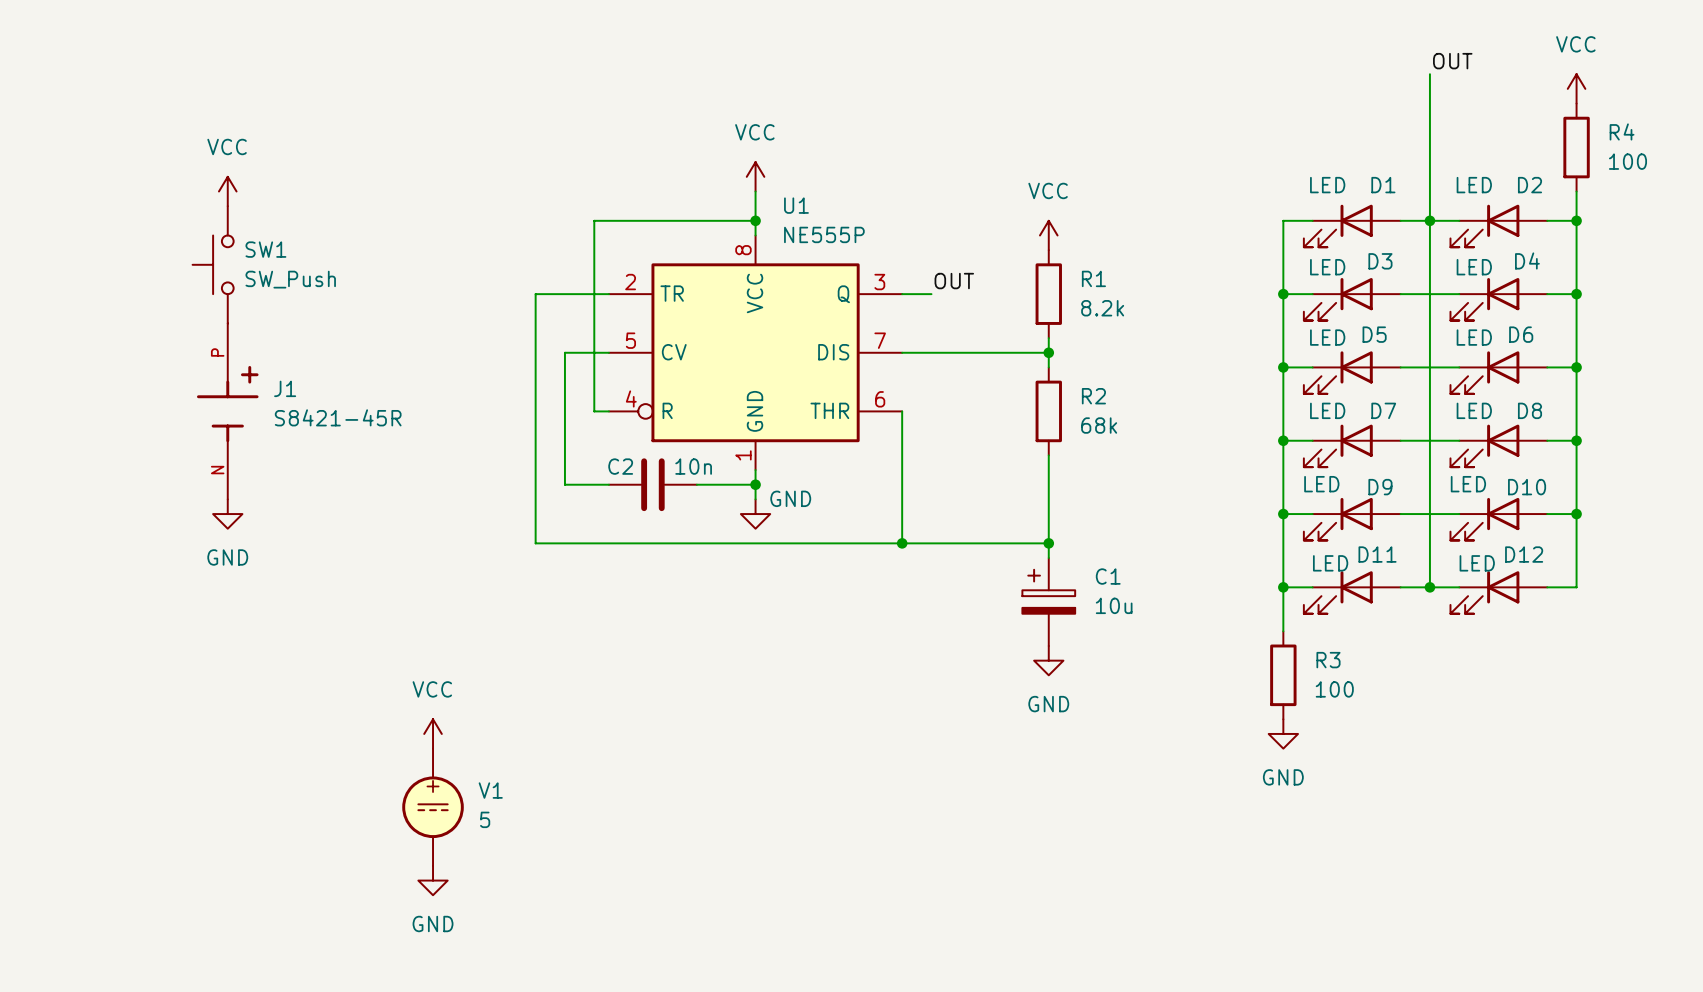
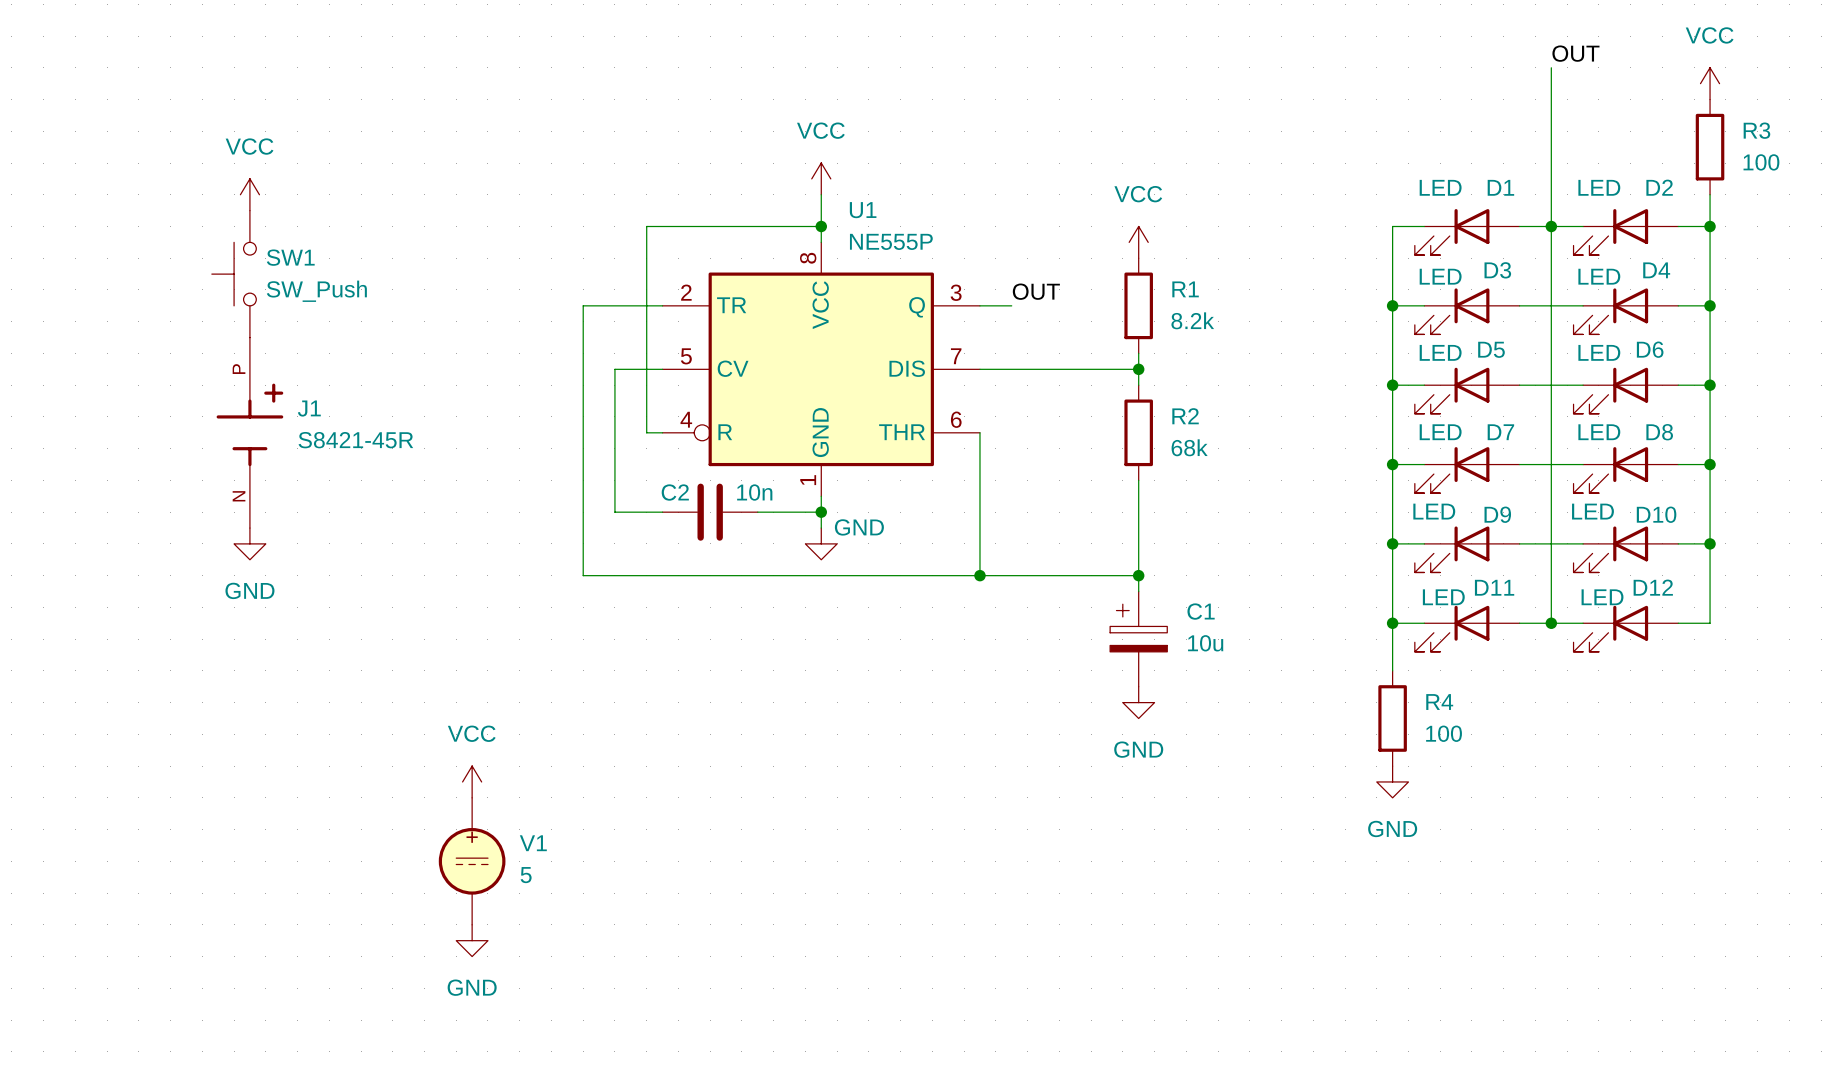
R4 name: R4 (1622, 131) -> R3 (1756, 130)
R3 name: R3 (1328, 660) -> R4 (1439, 702)

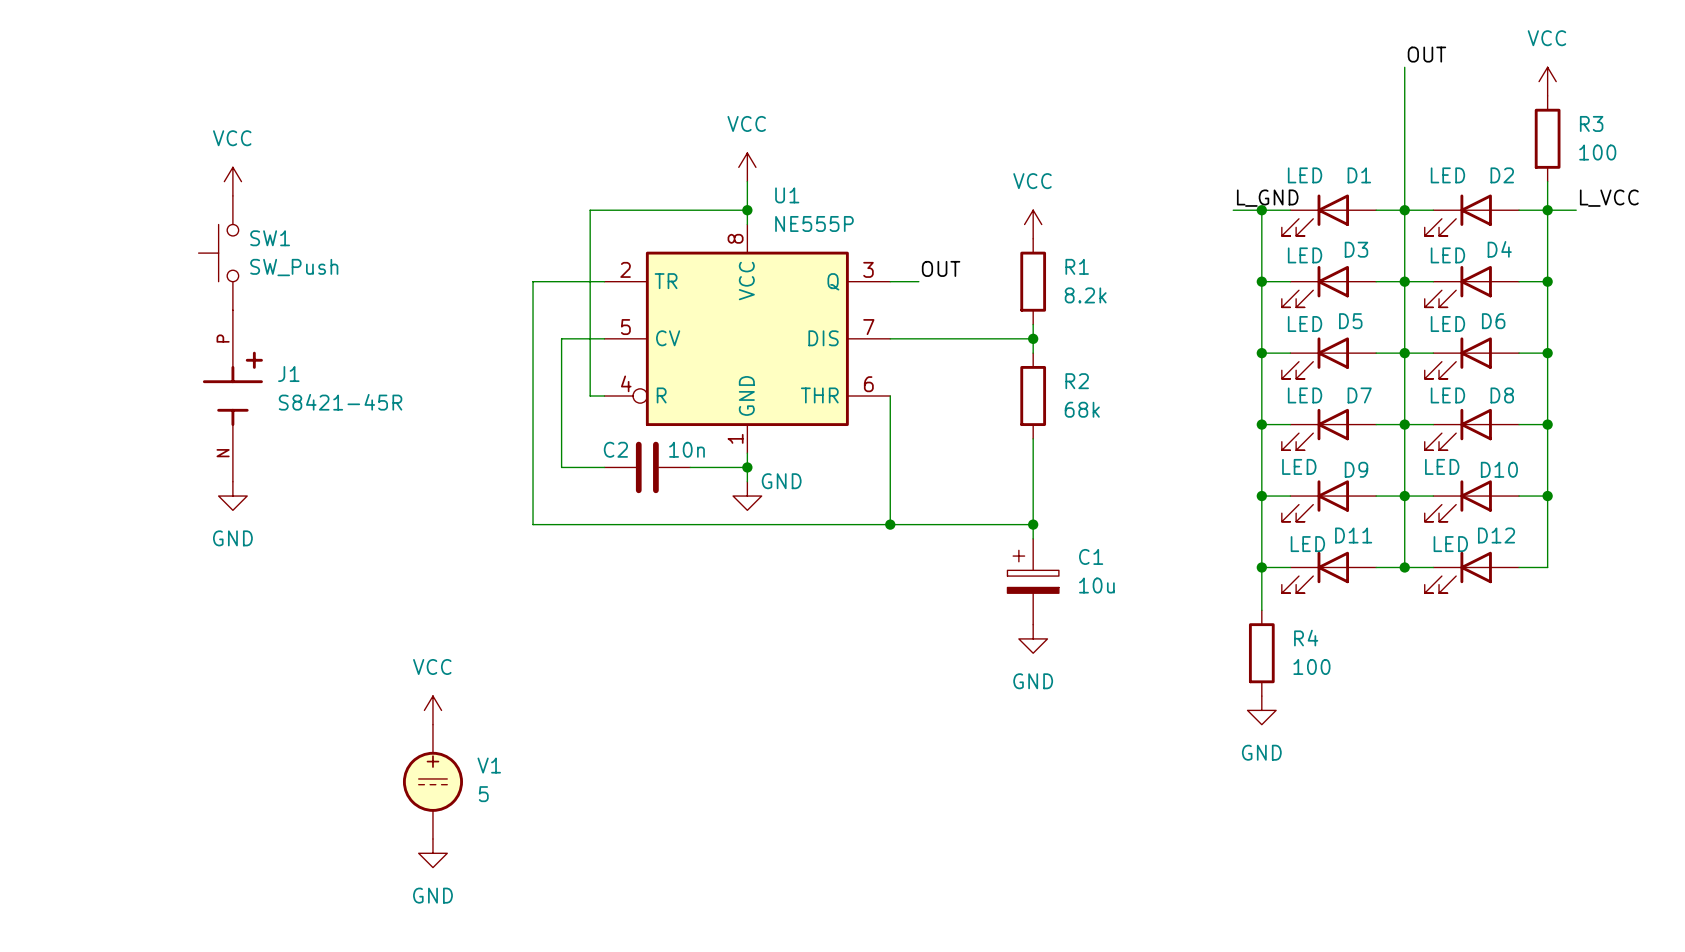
label: none -> L_GND (1267, 198)
label: none -> L_VCC (1609, 198)
wire: none -> (1233, 210) (1261, 210)
junction: none -> (1261, 210)
wire: none -> (1547, 210) (1576, 210)
junction: none -> (1404, 281)
junction: none -> (1404, 353)
junction: none -> (1404, 424)
junction: none -> (1404, 496)

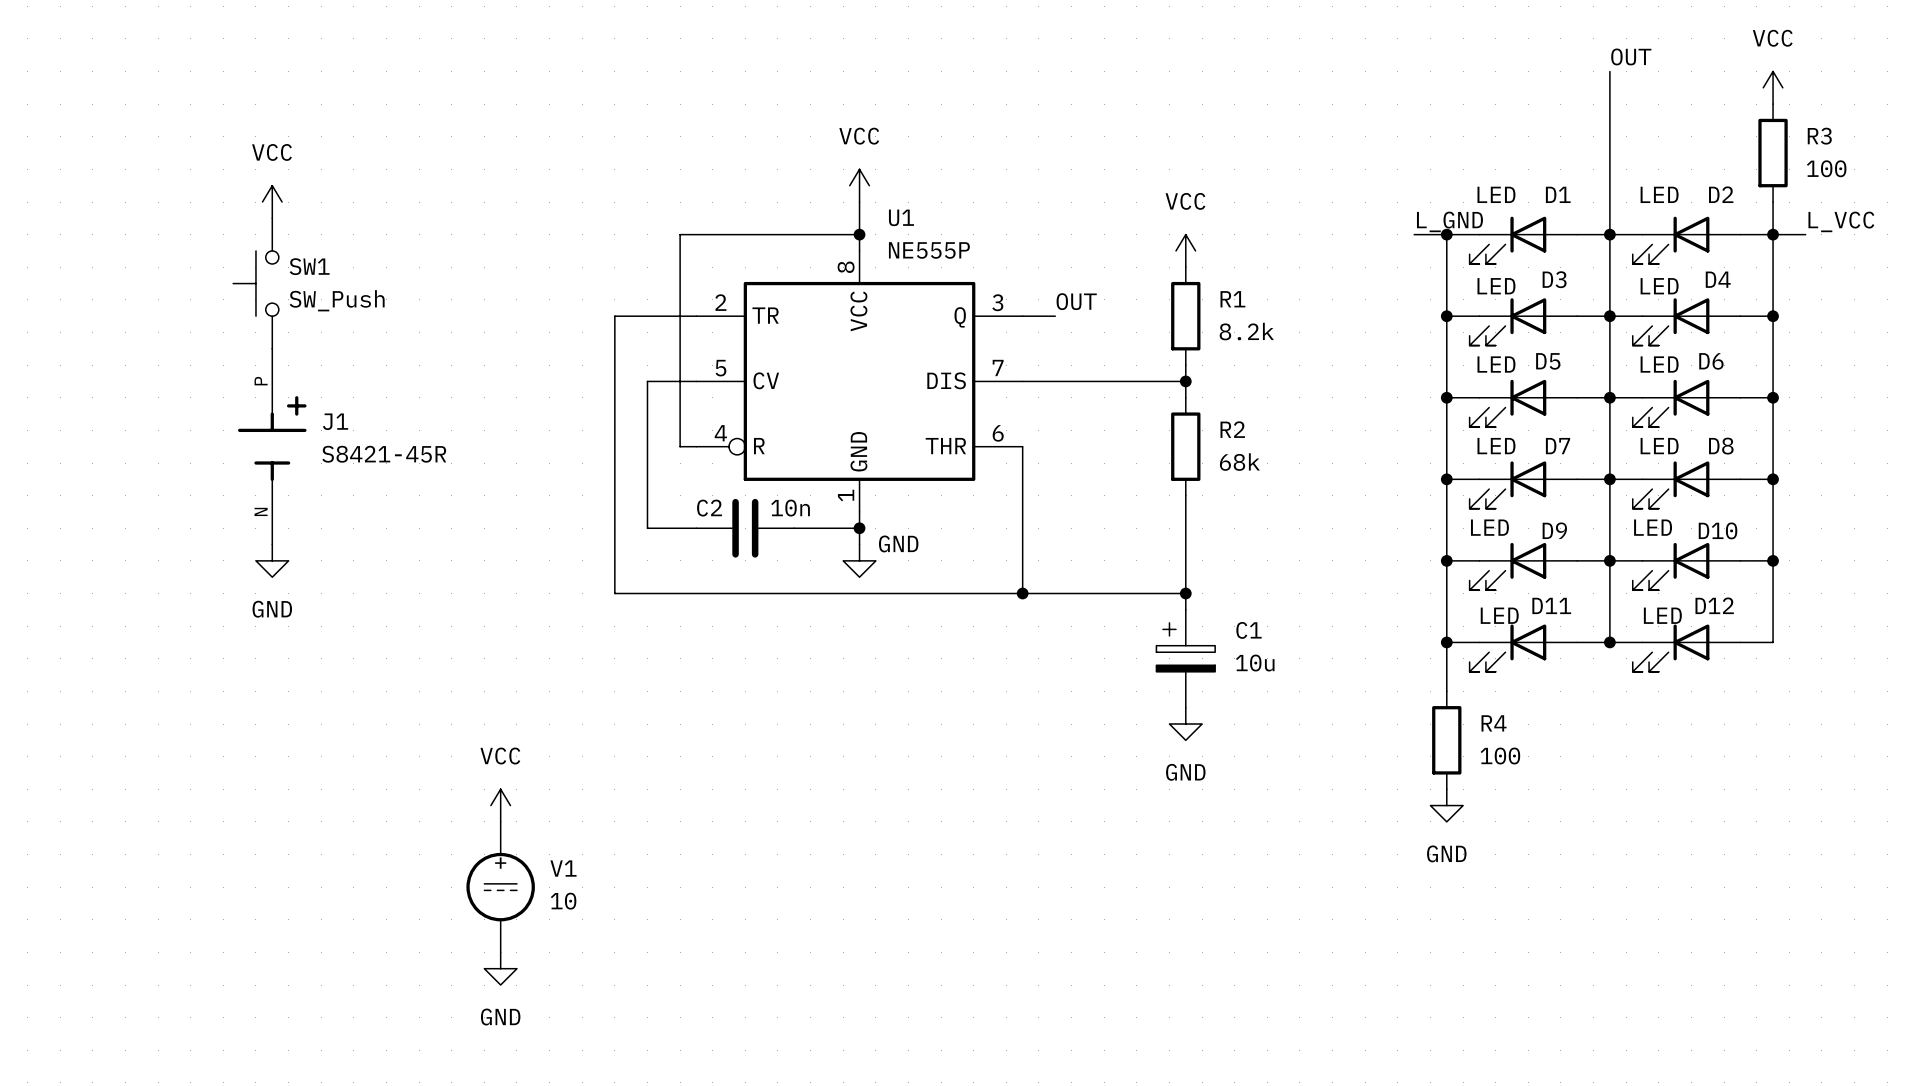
V1 value: 5 (483, 794) -> 10 (563, 901)

